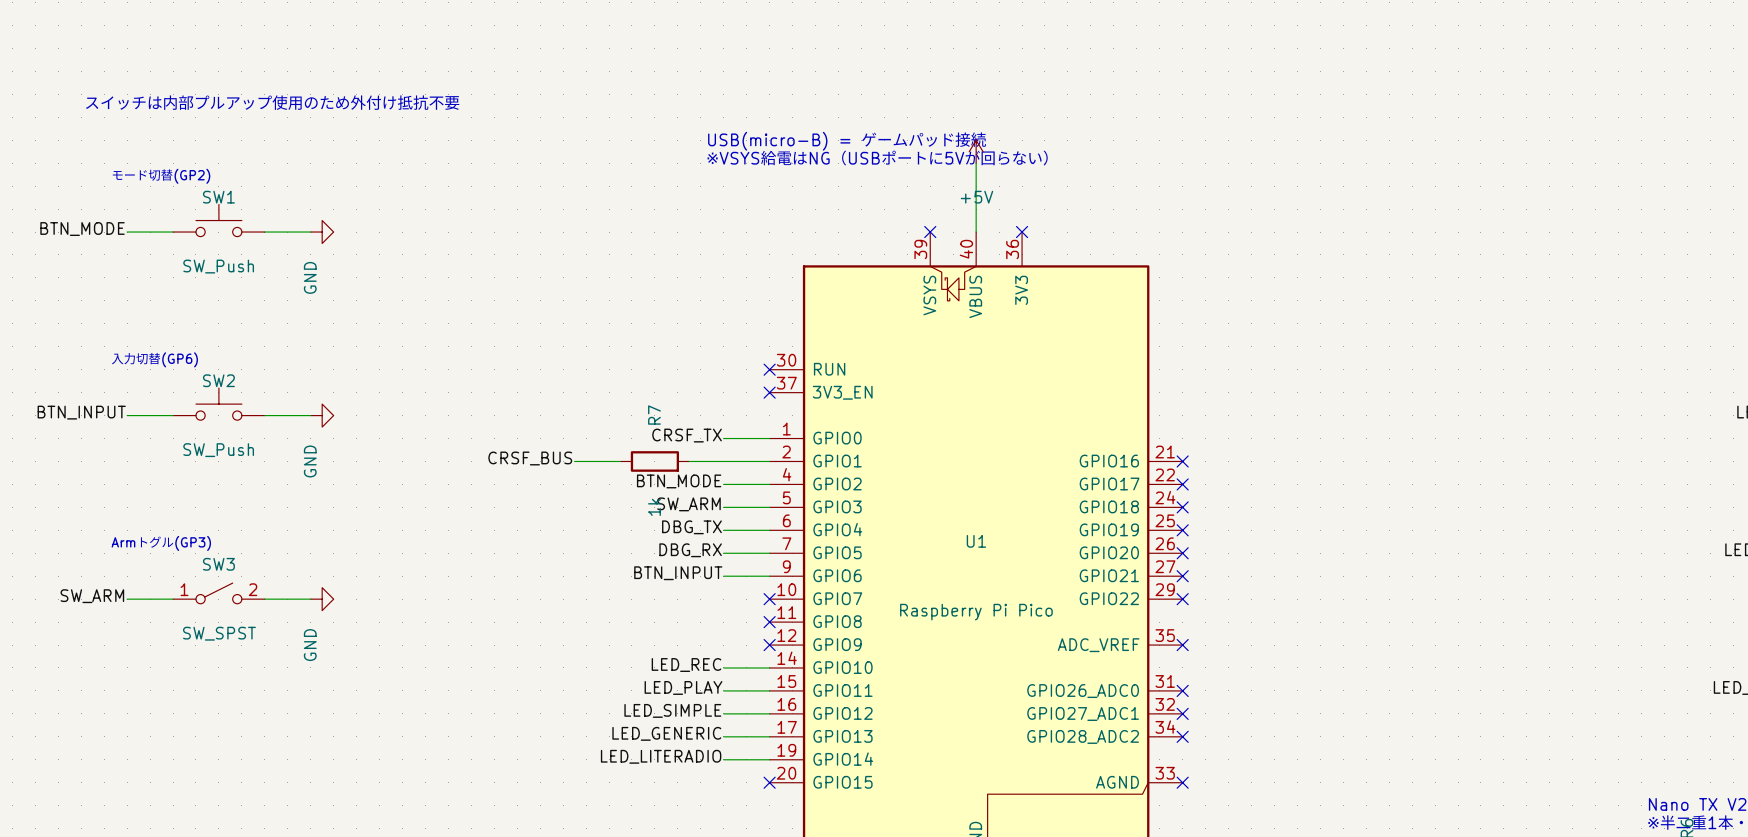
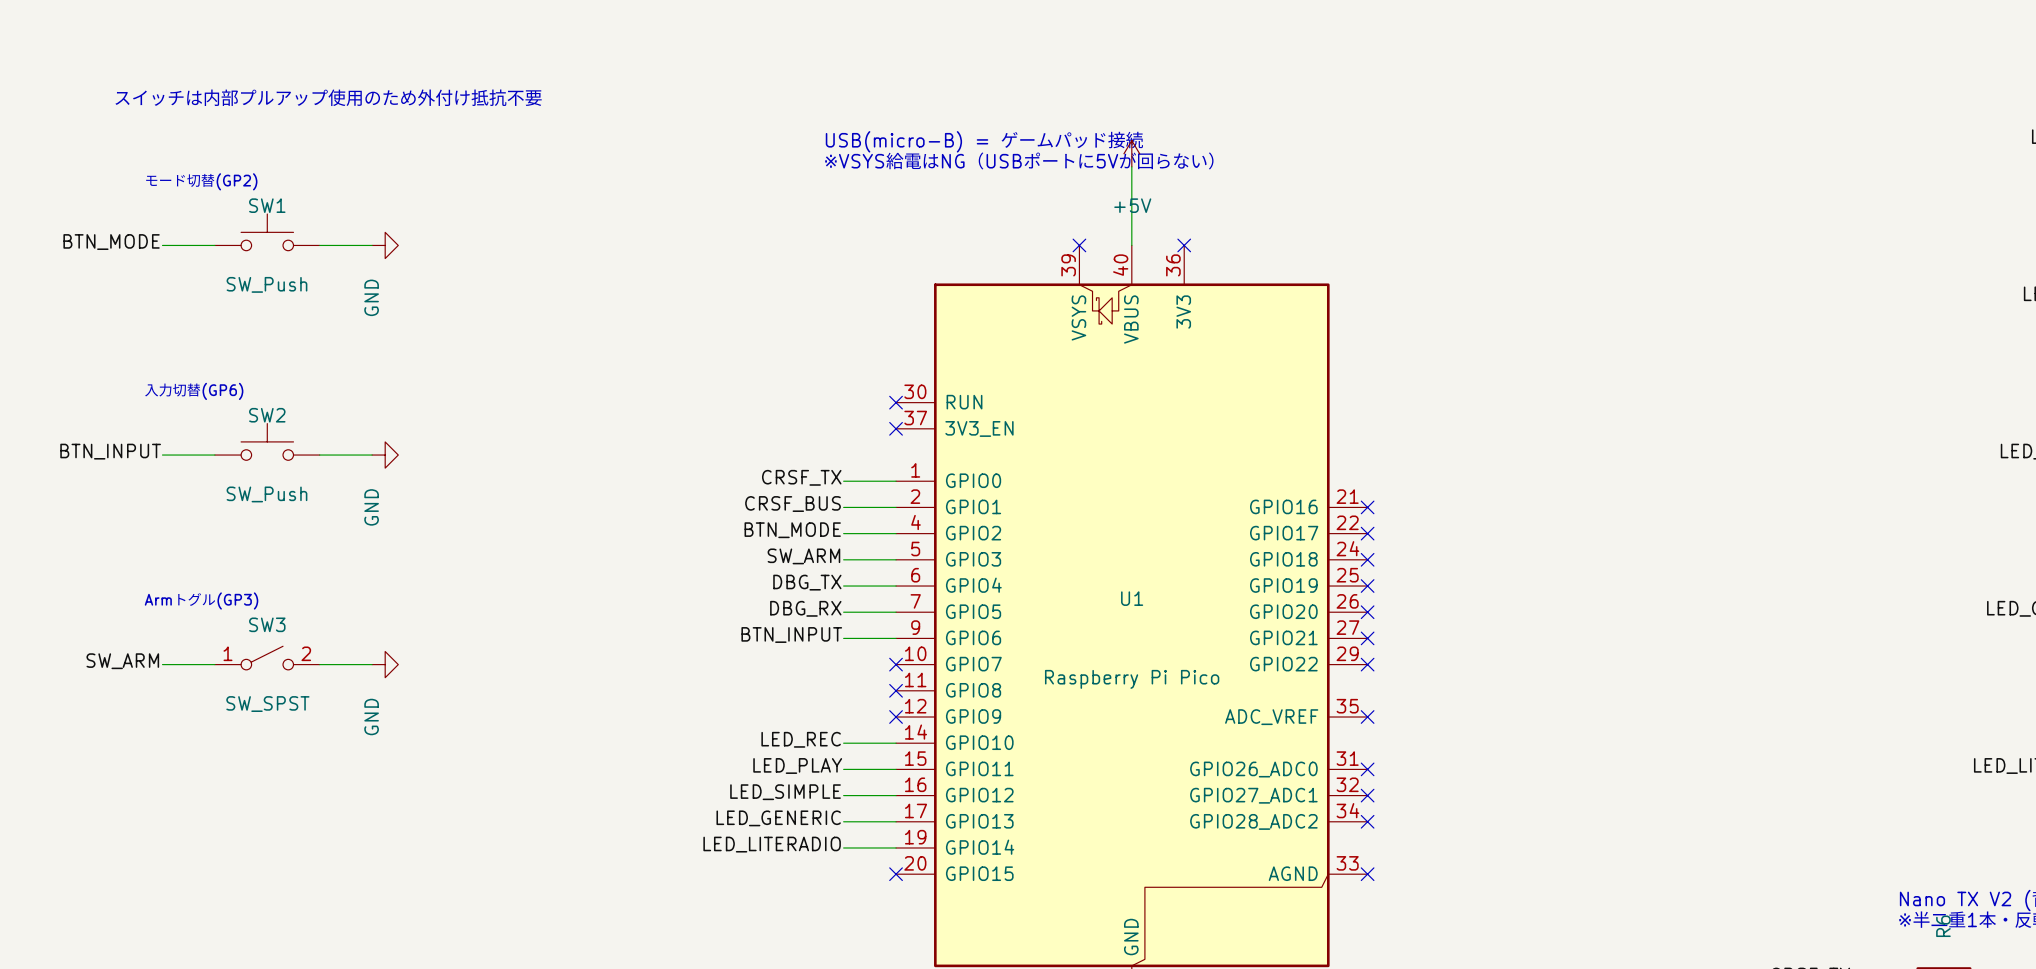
label position: CRSF_BUS (530, 458) -> CRSF_BUS (793, 504)
wire: (574, 461) (620, 461) -> none
R7: 1k (654, 461) -> none
wire: (689, 461) (723, 461) -> none

